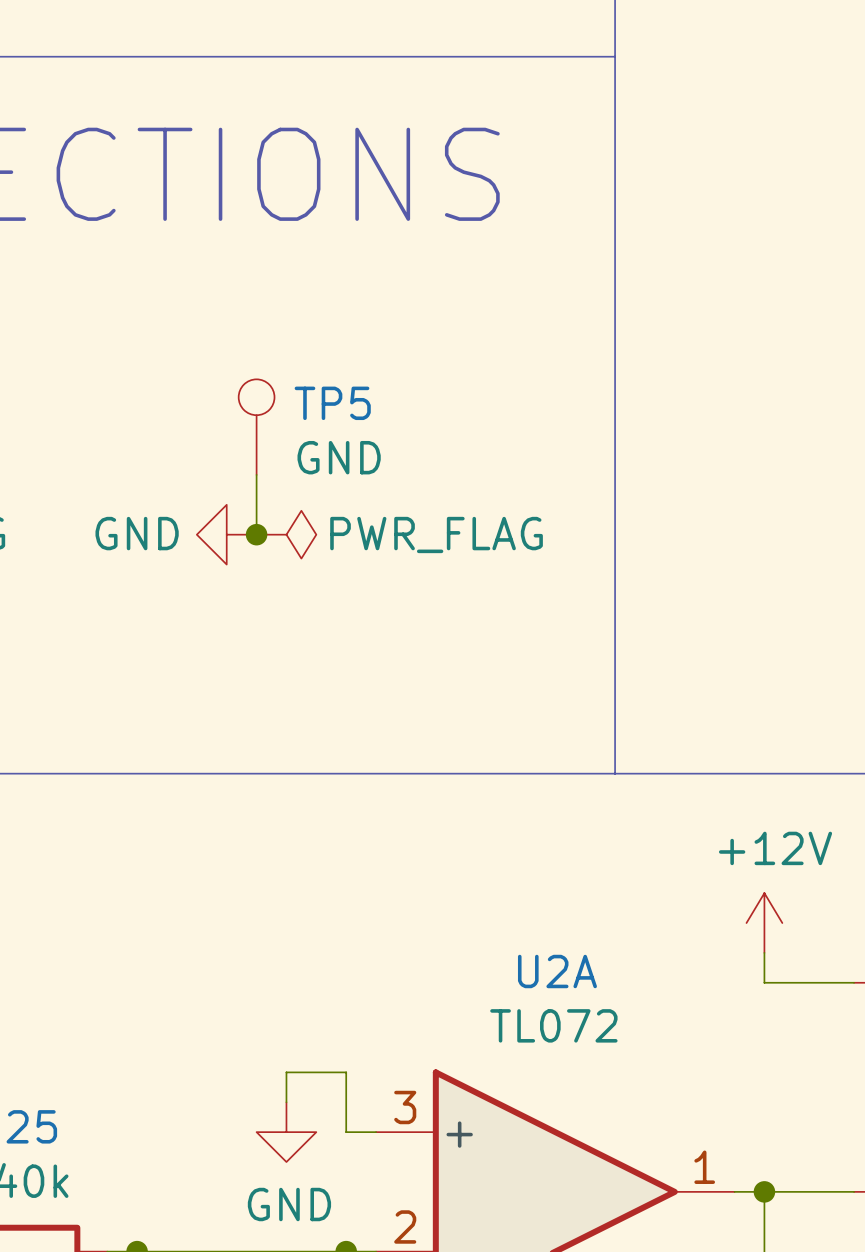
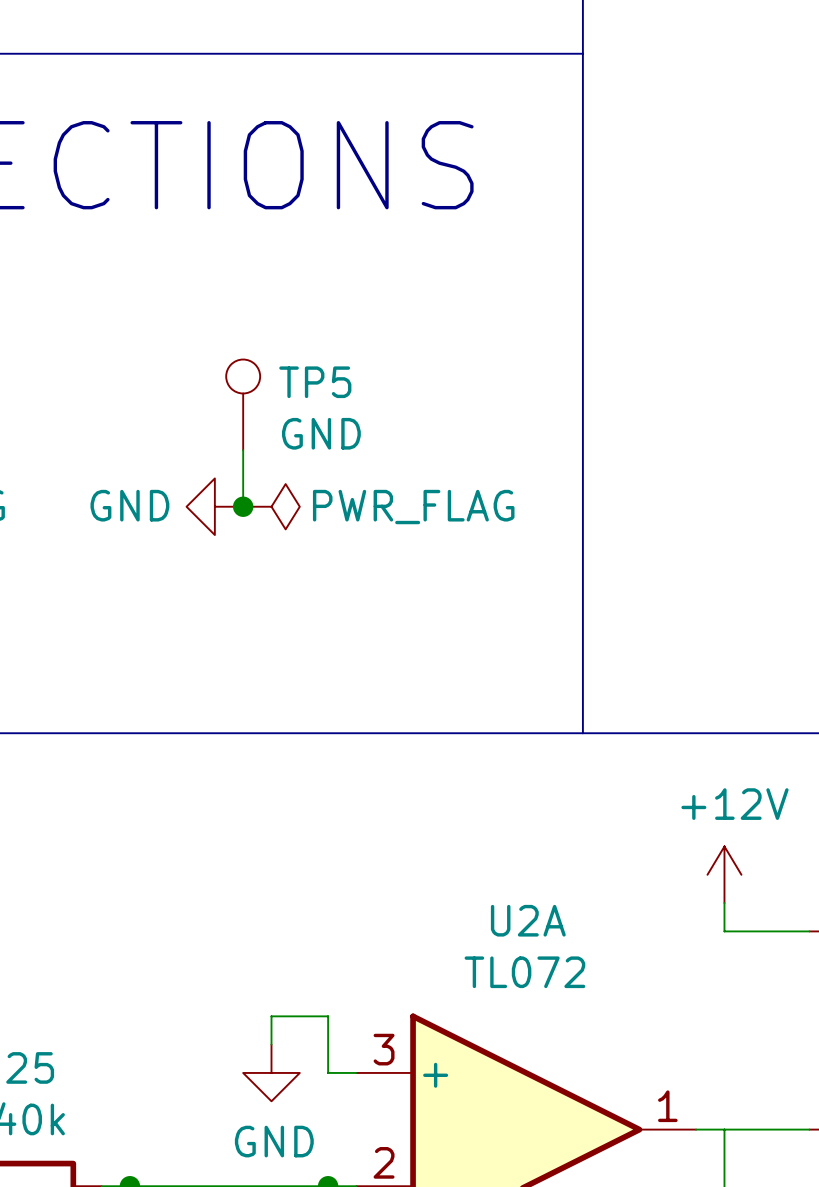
junction: (764, 1191) -> none

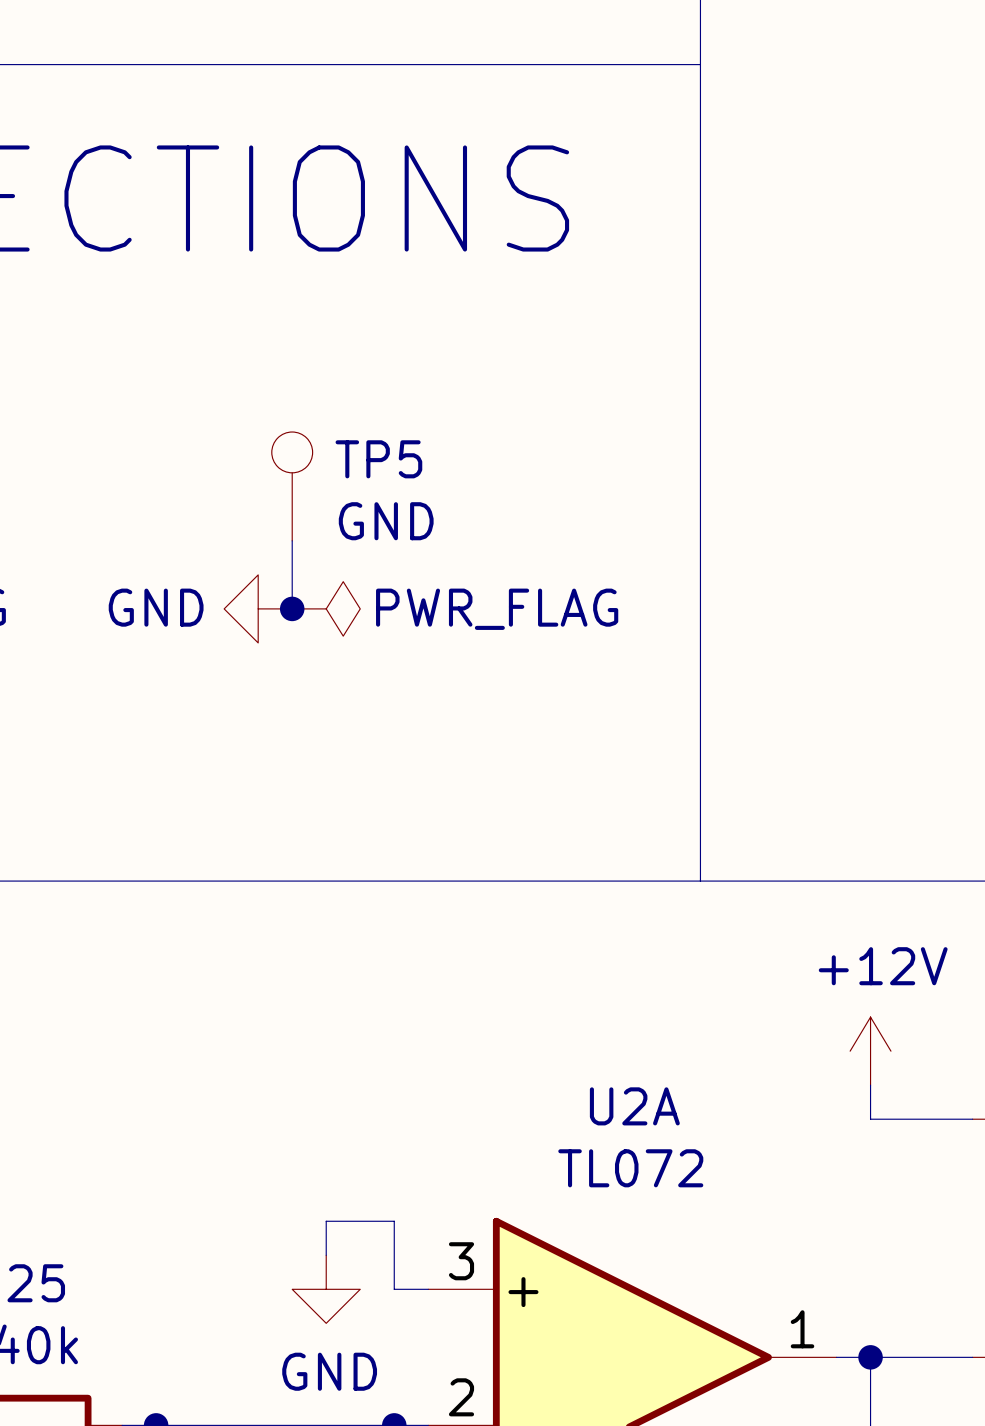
junction: none -> (870, 1357)

